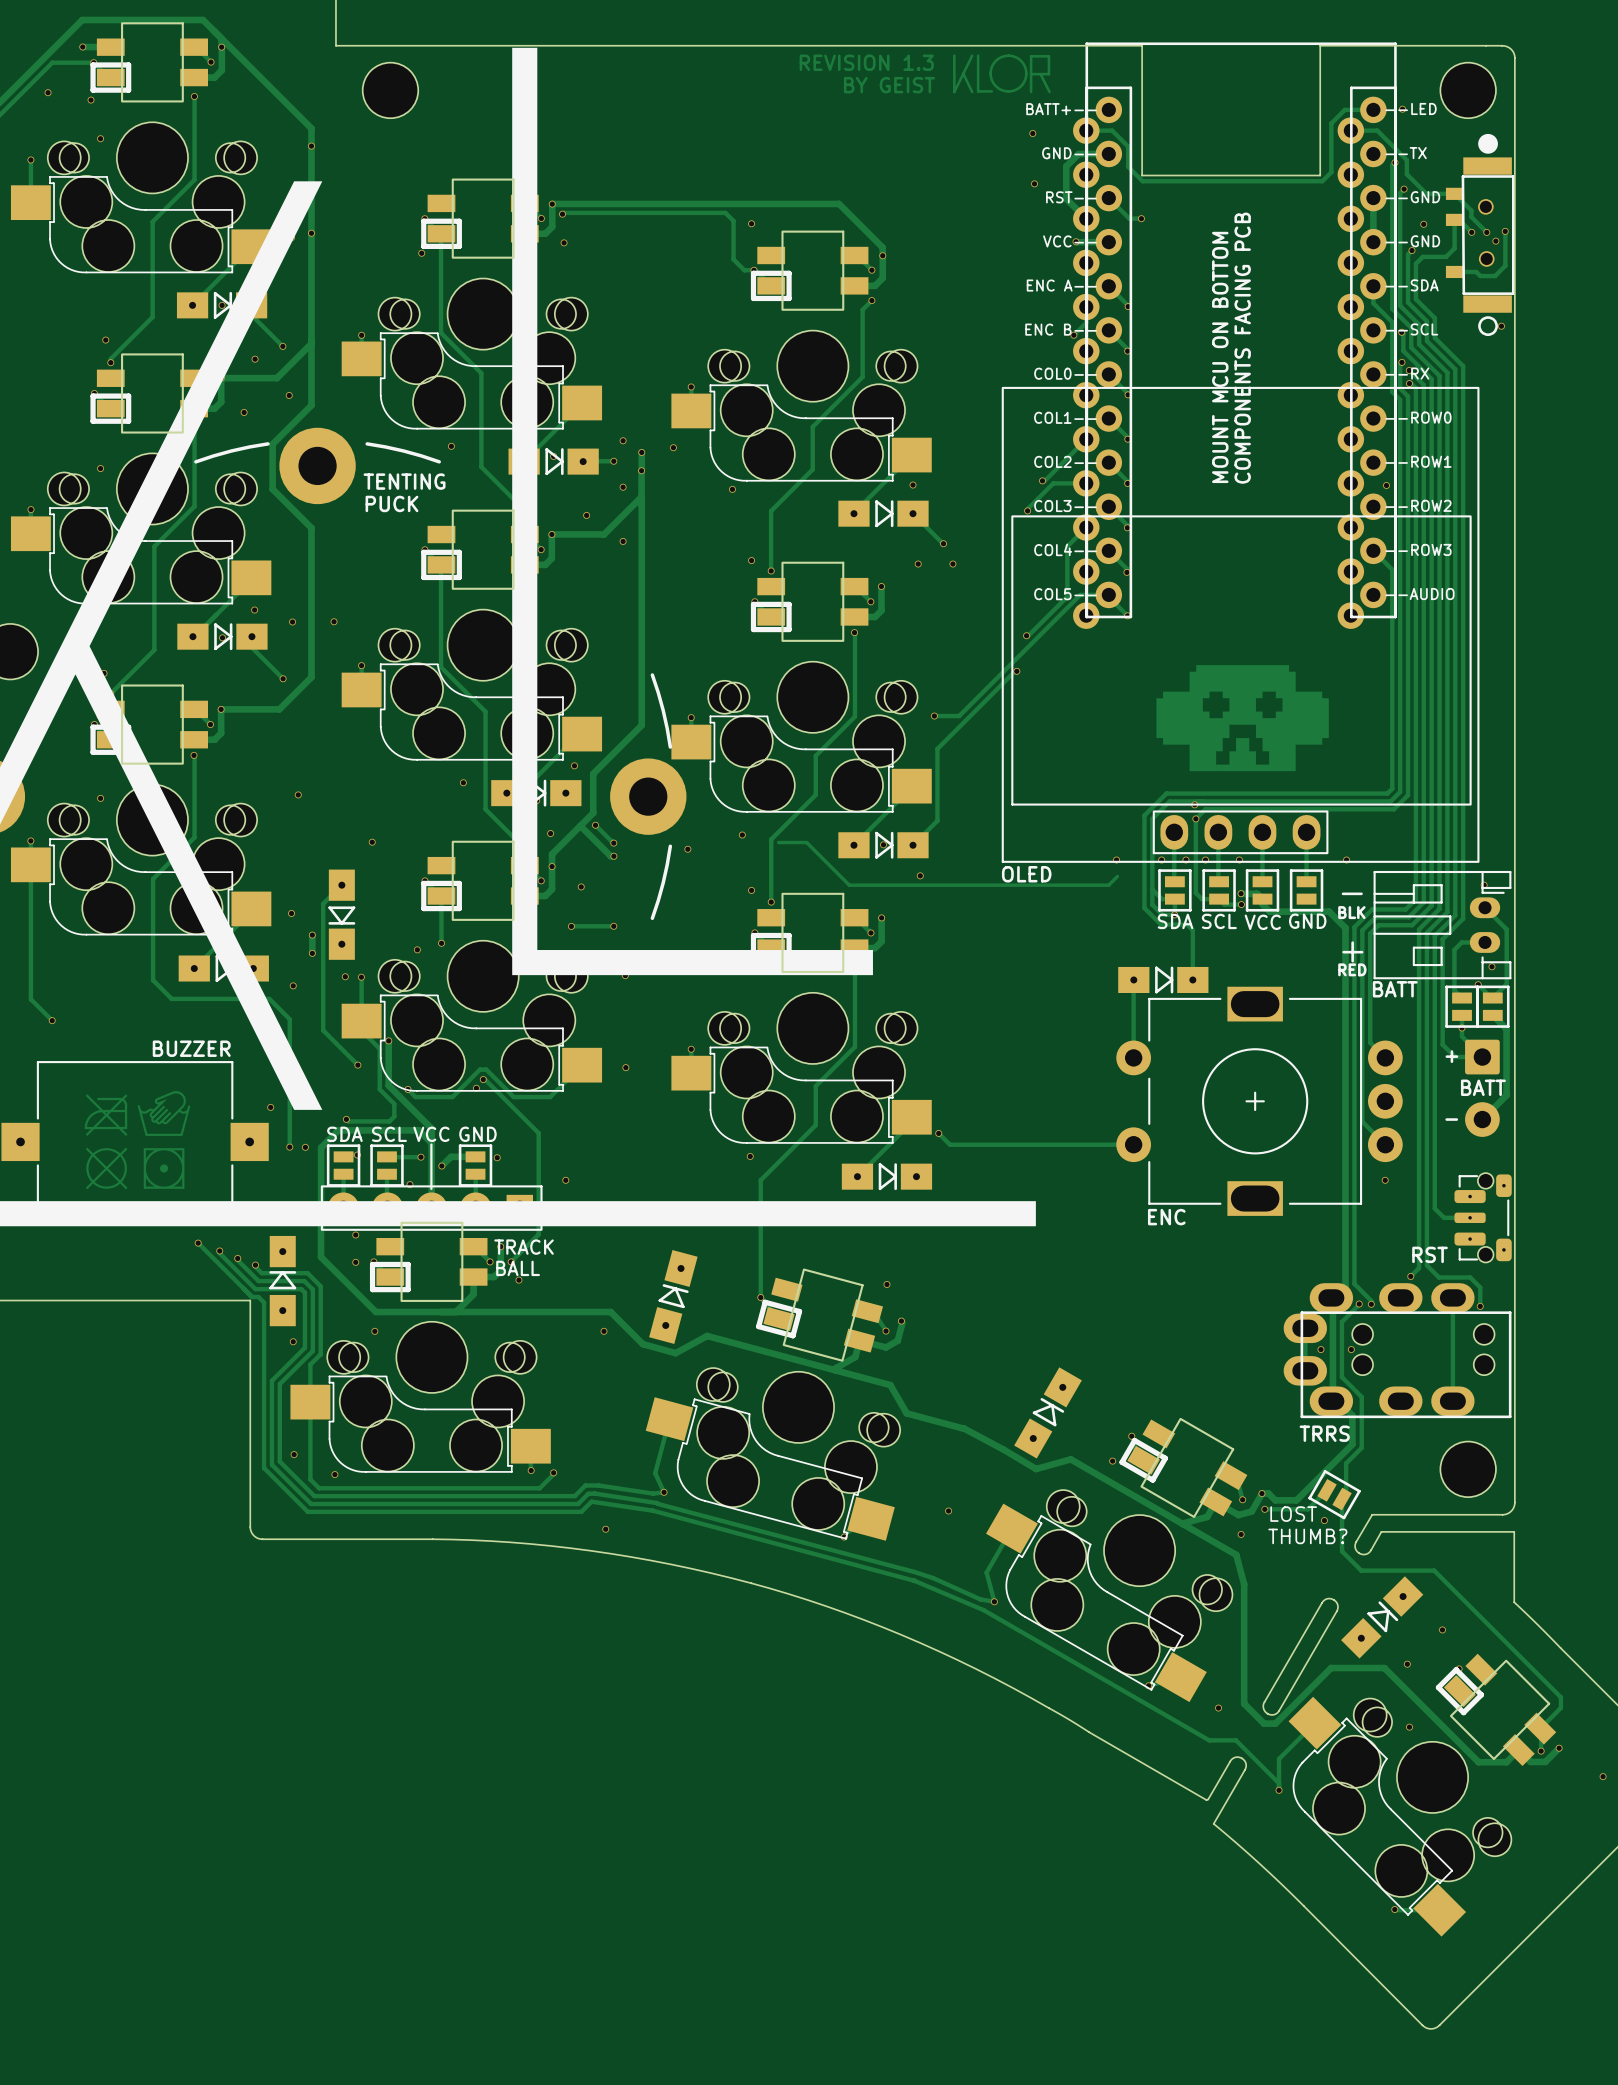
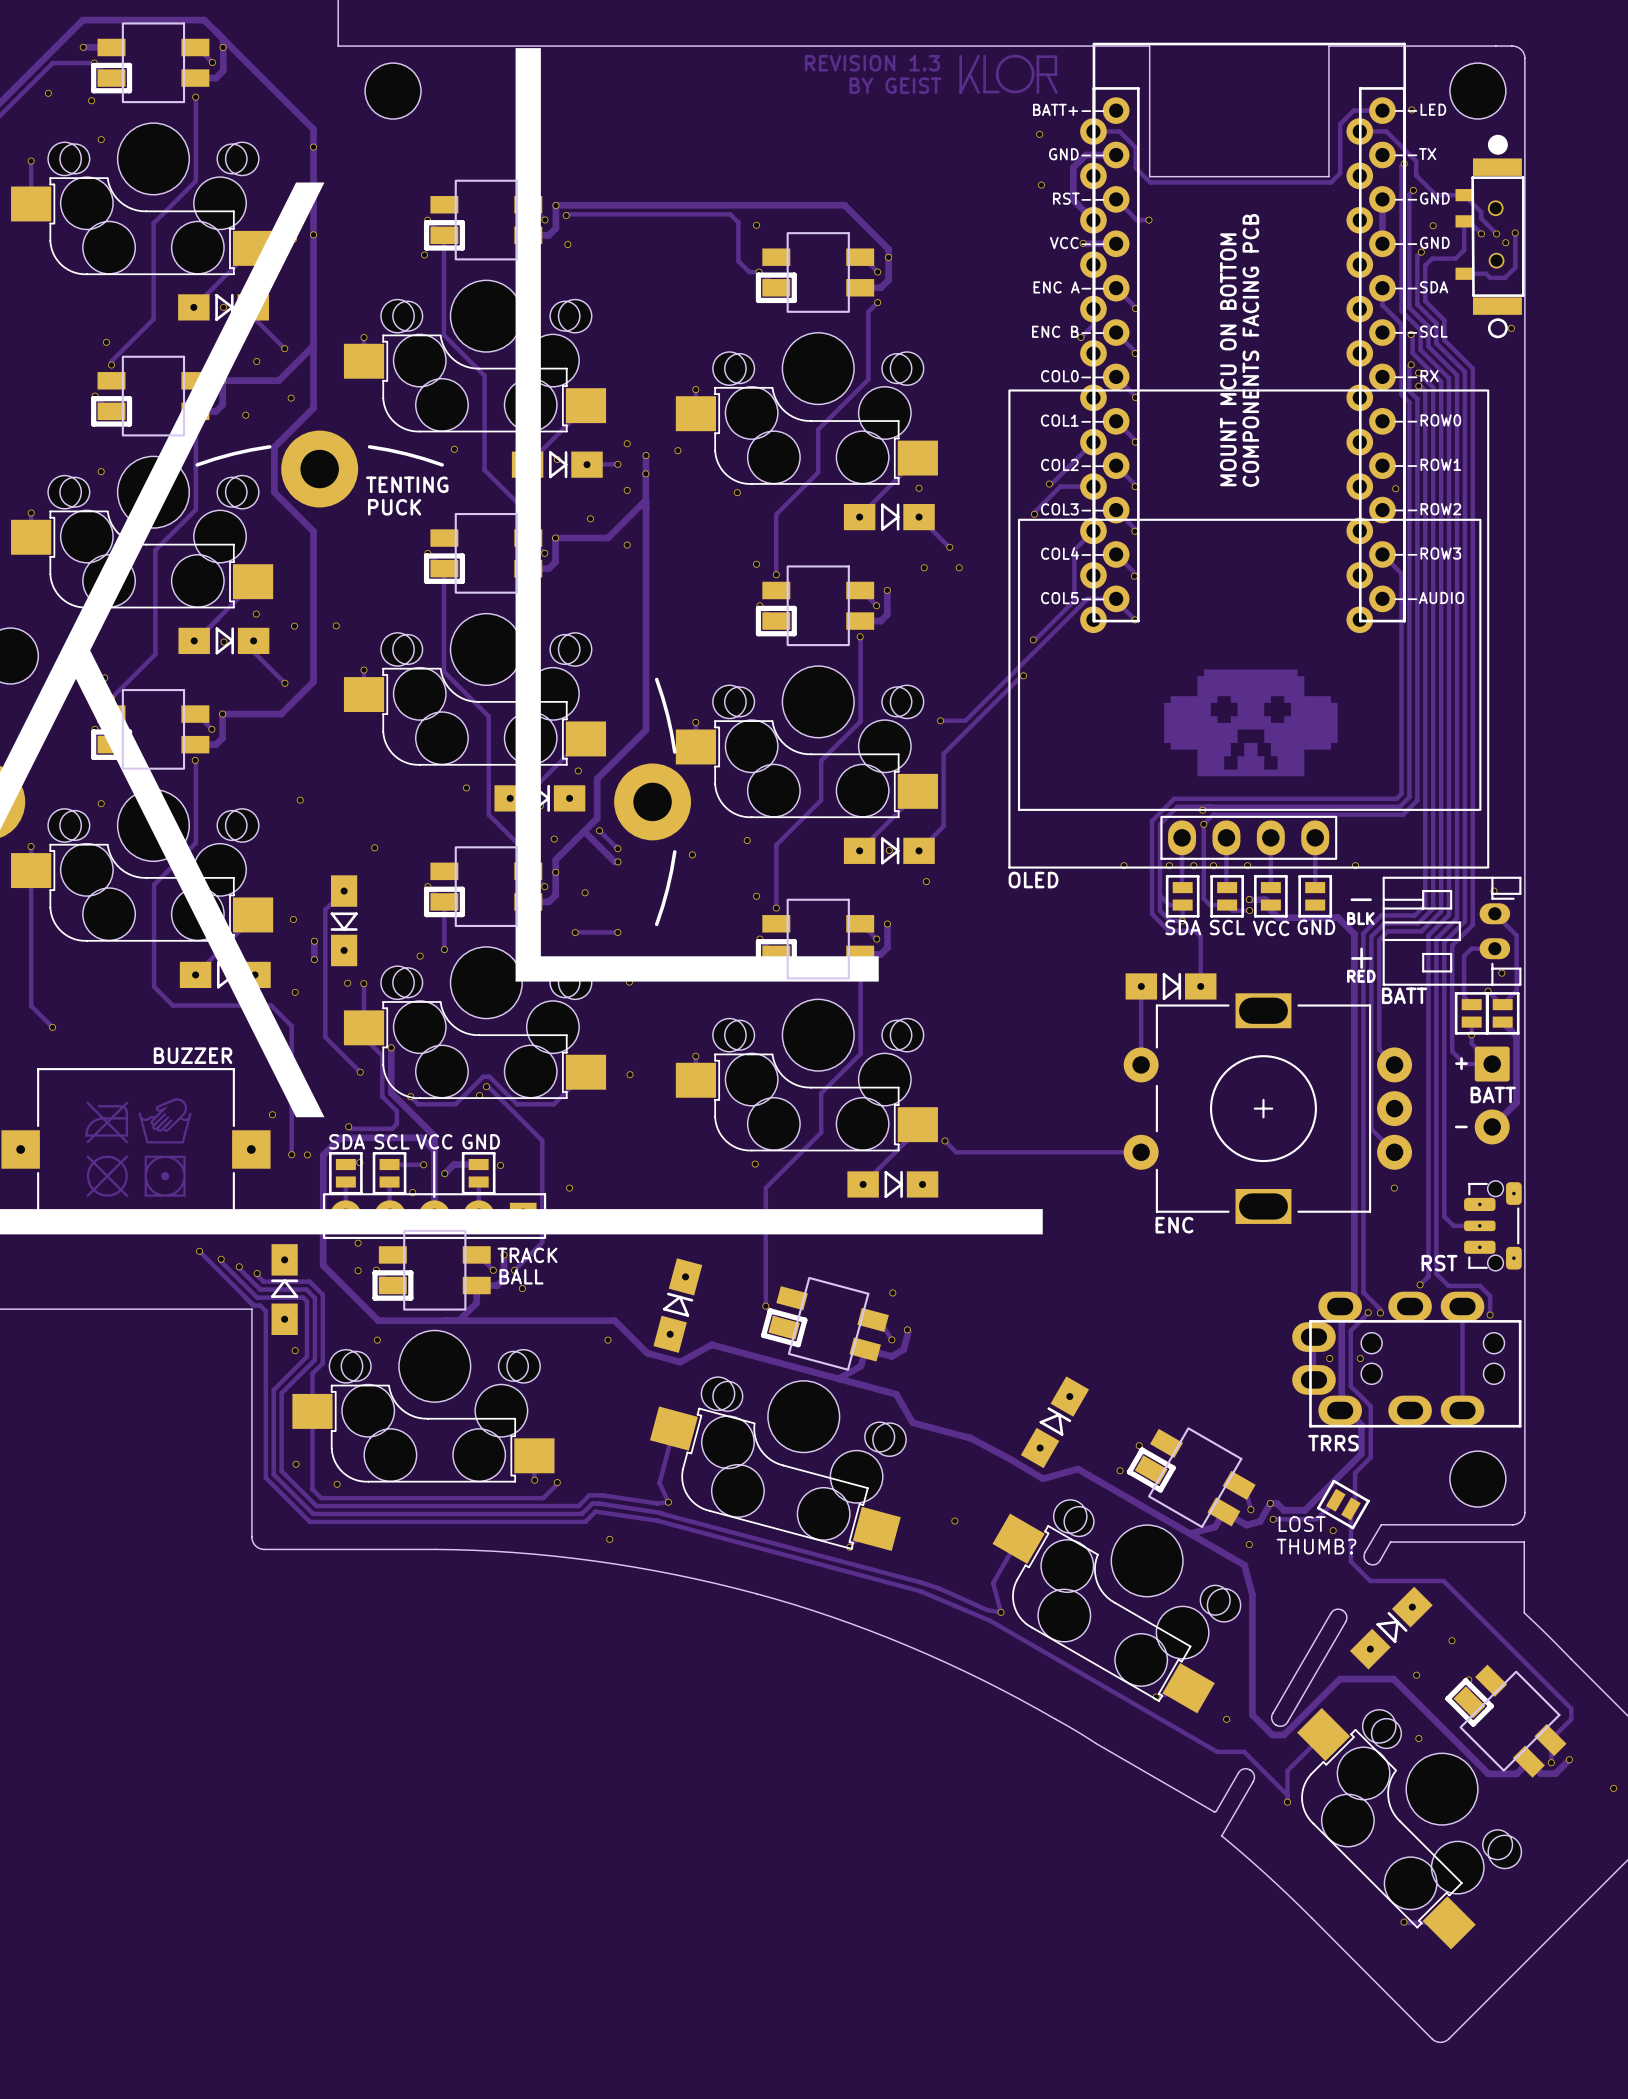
track: (778, 842) (806, 842) (849, 885) (1108, 885) (1117, 876) -> none

